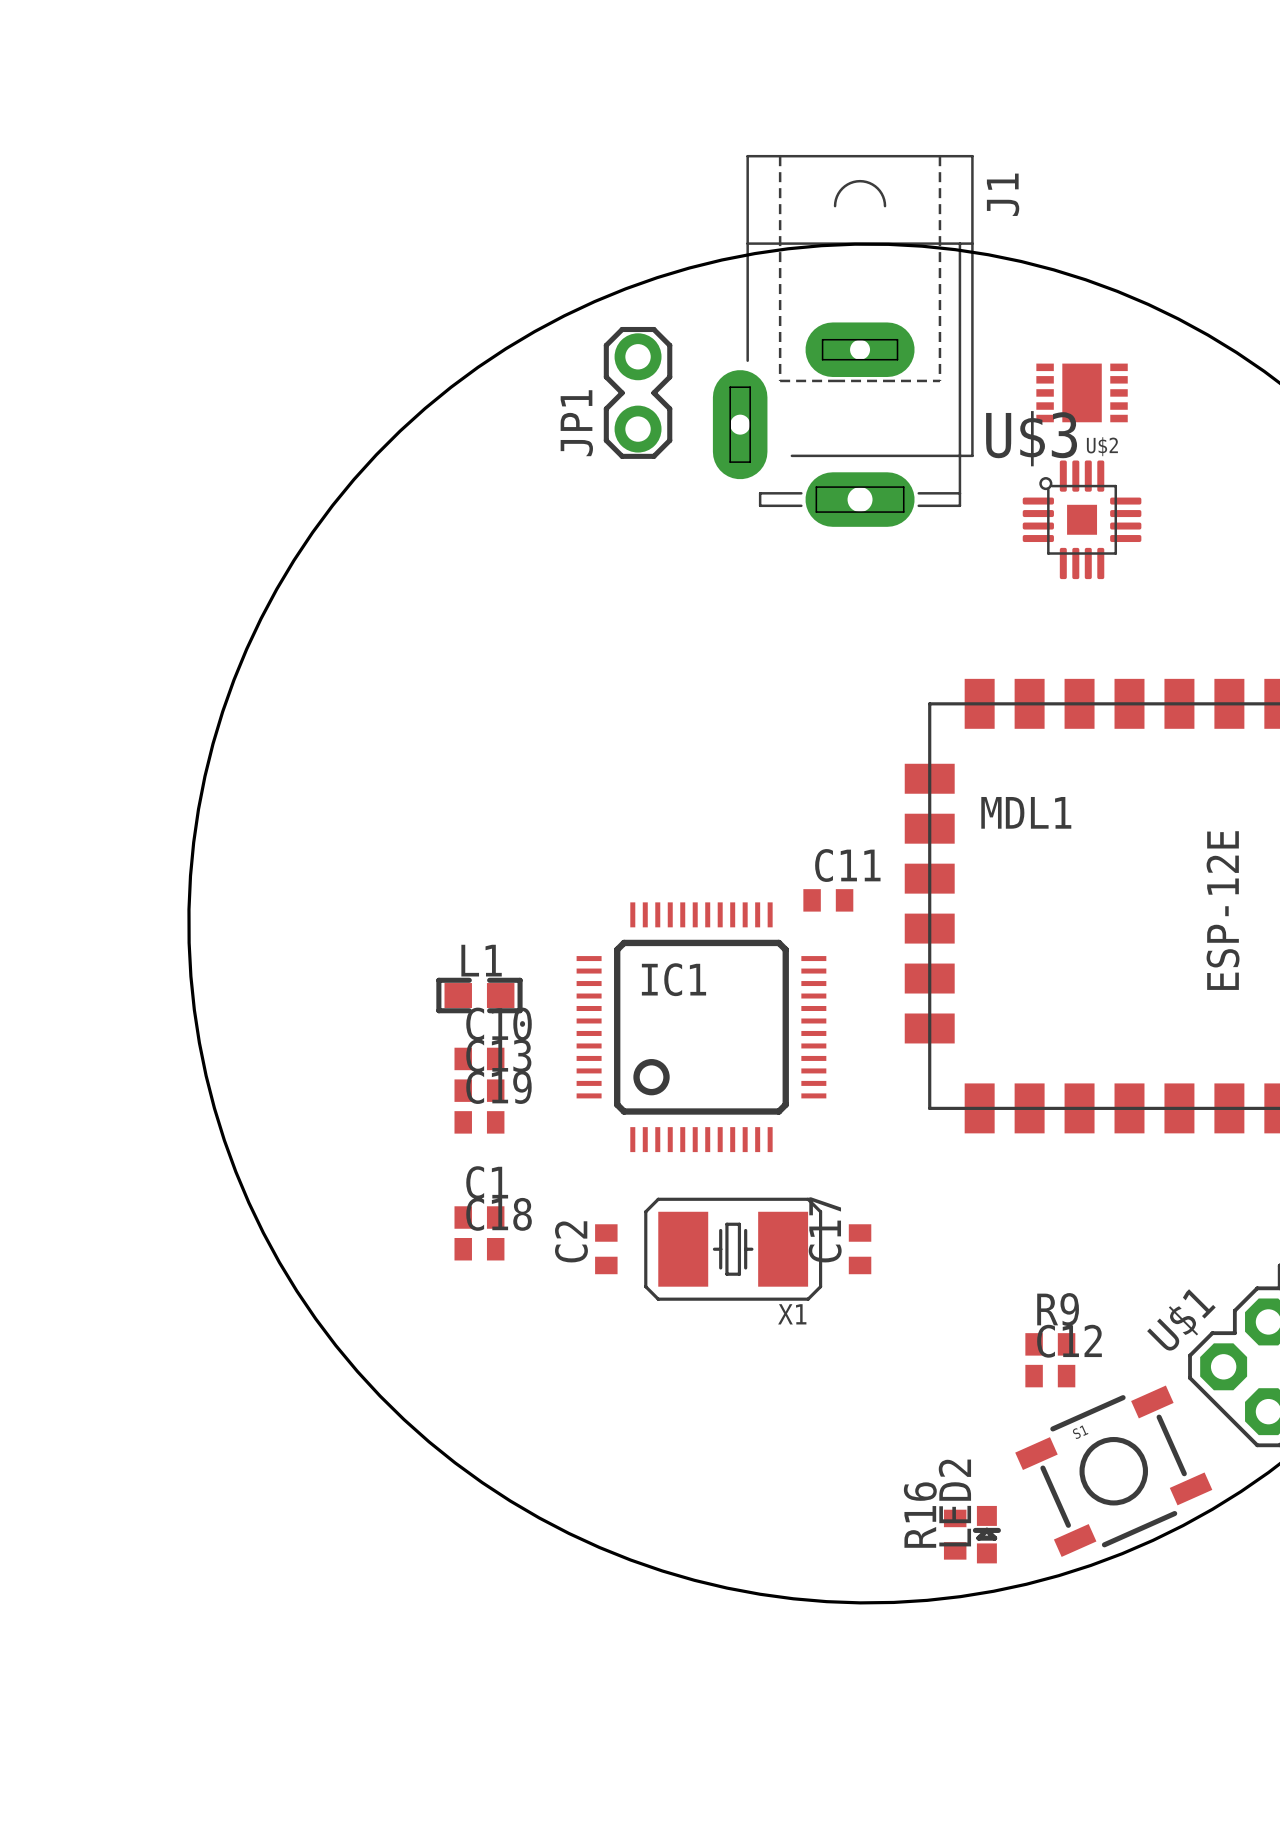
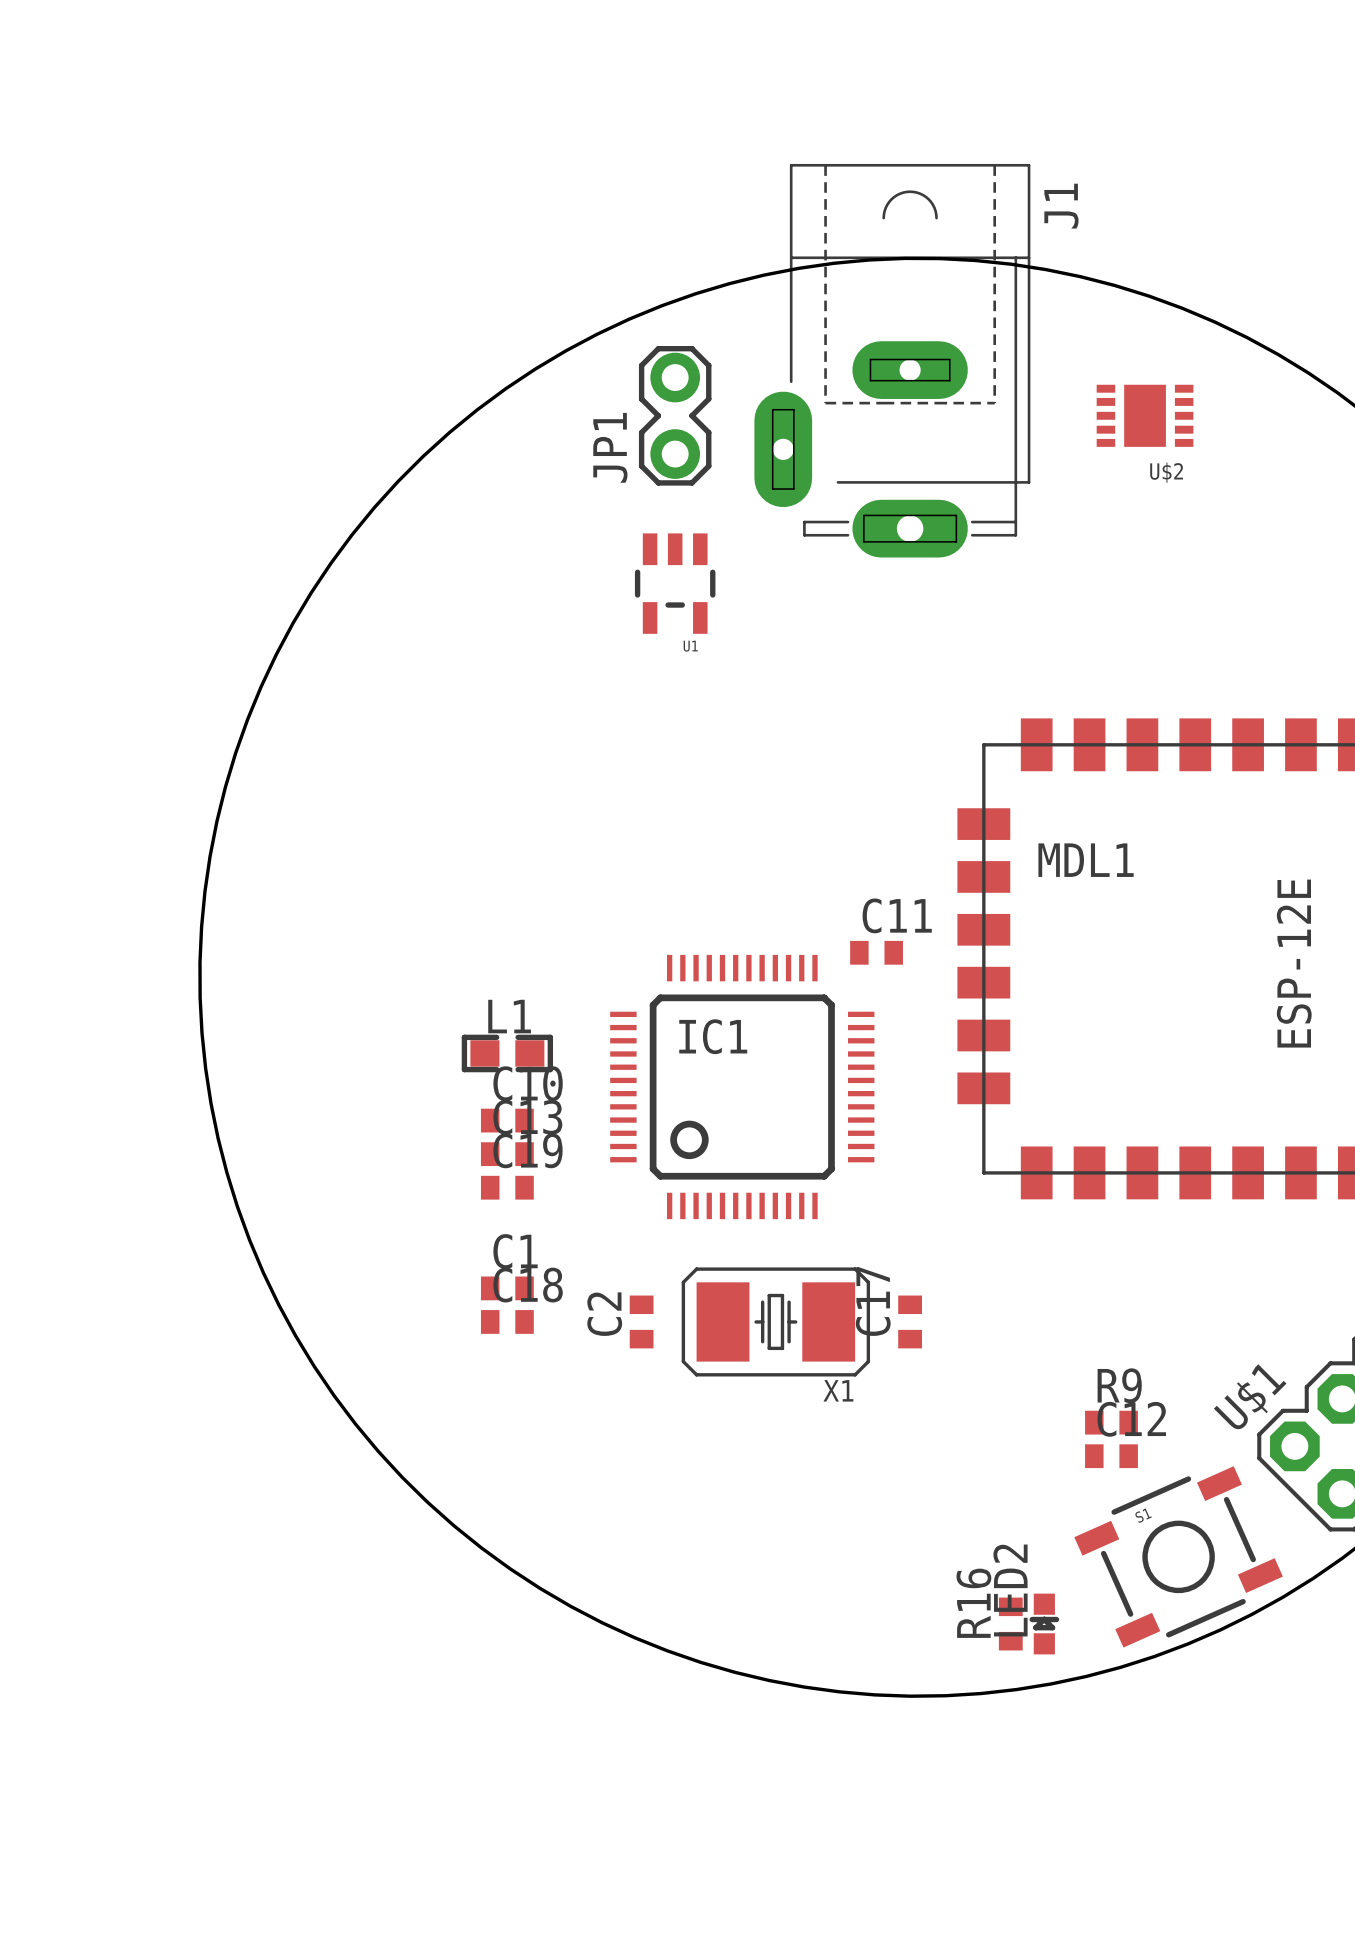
U$3: (1082, 519) -> none
U1: none -> (675, 583)

